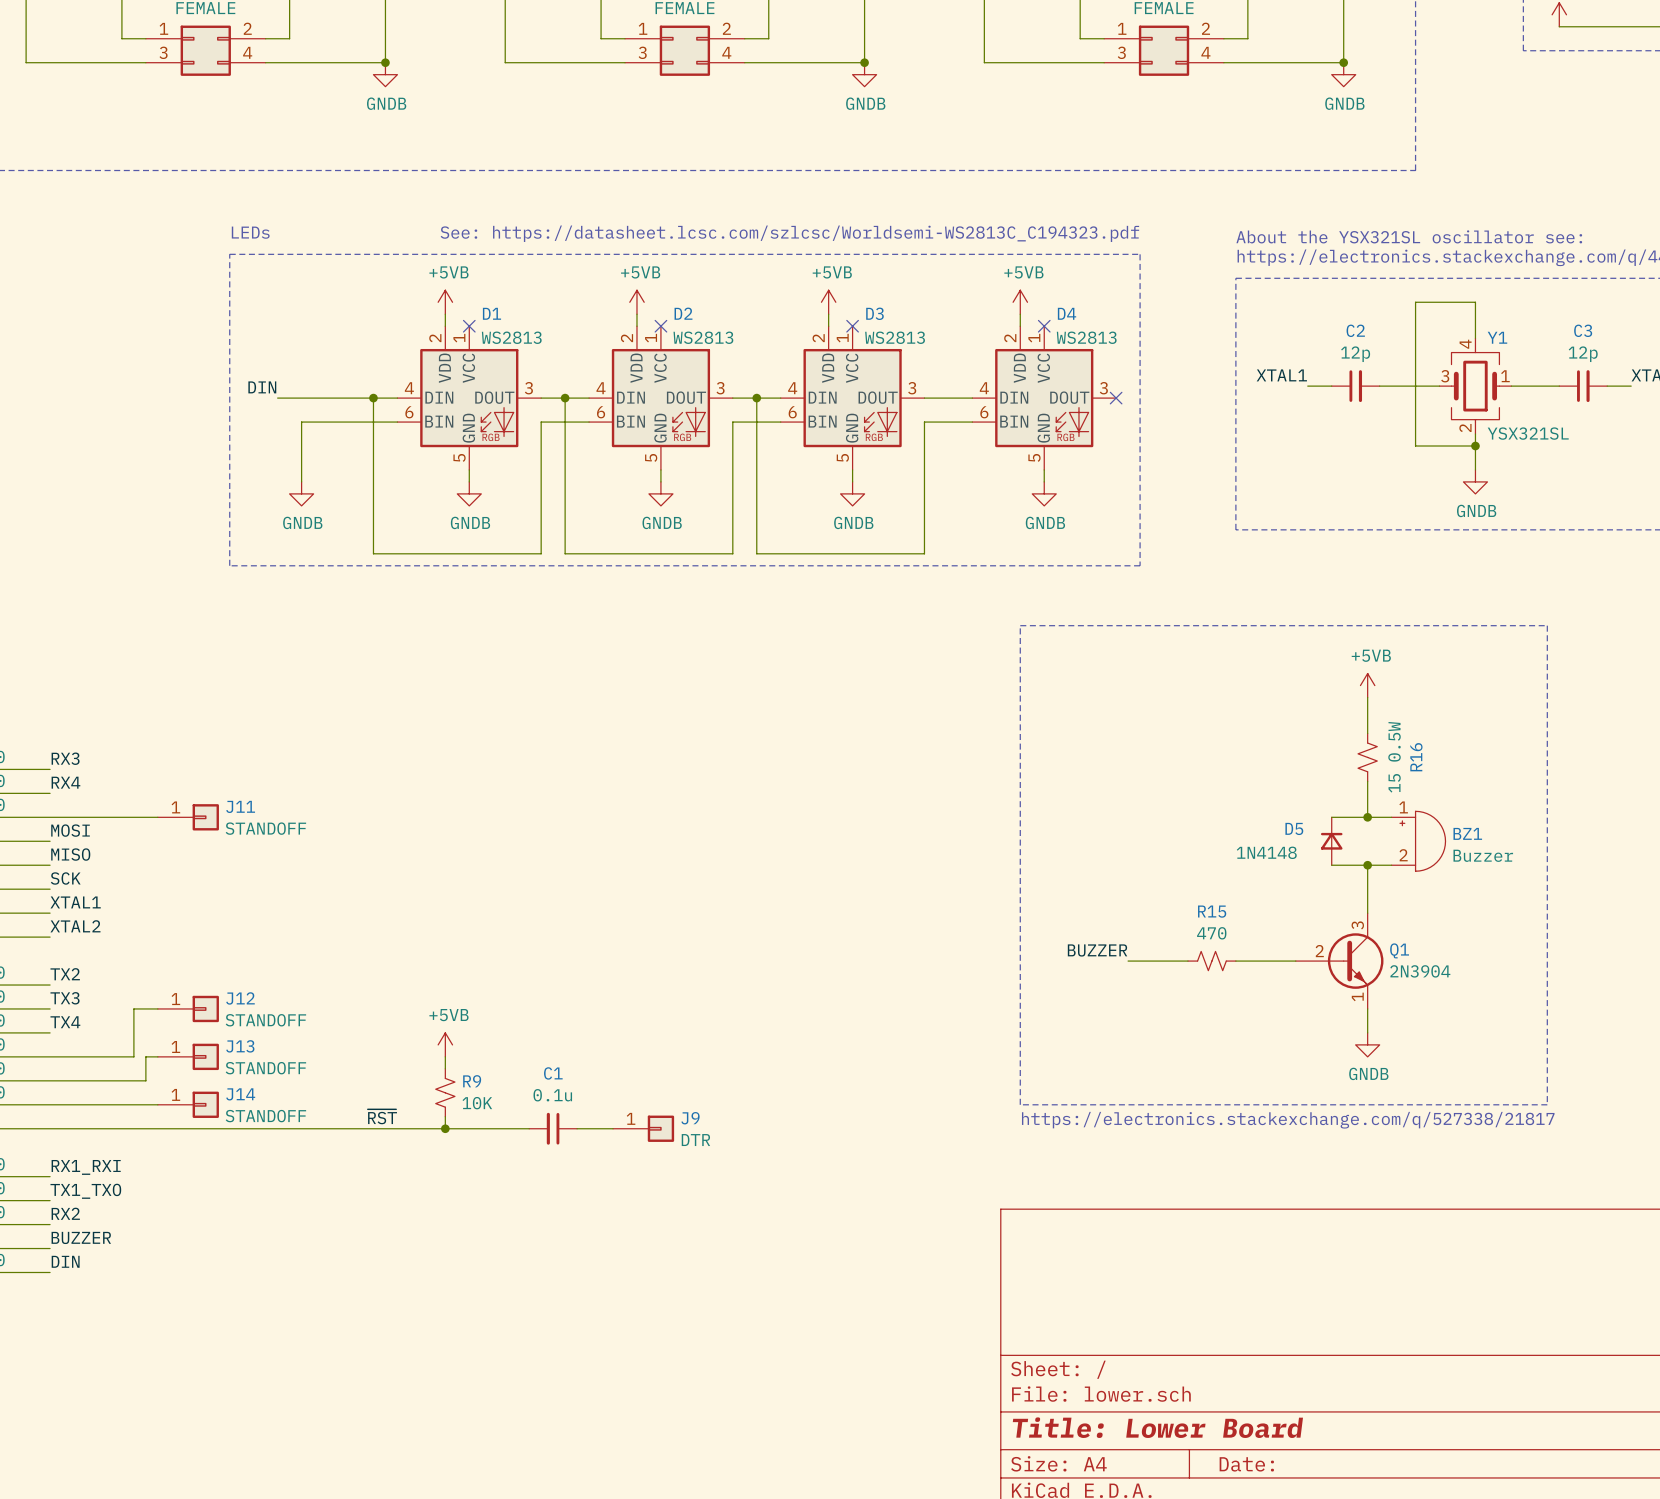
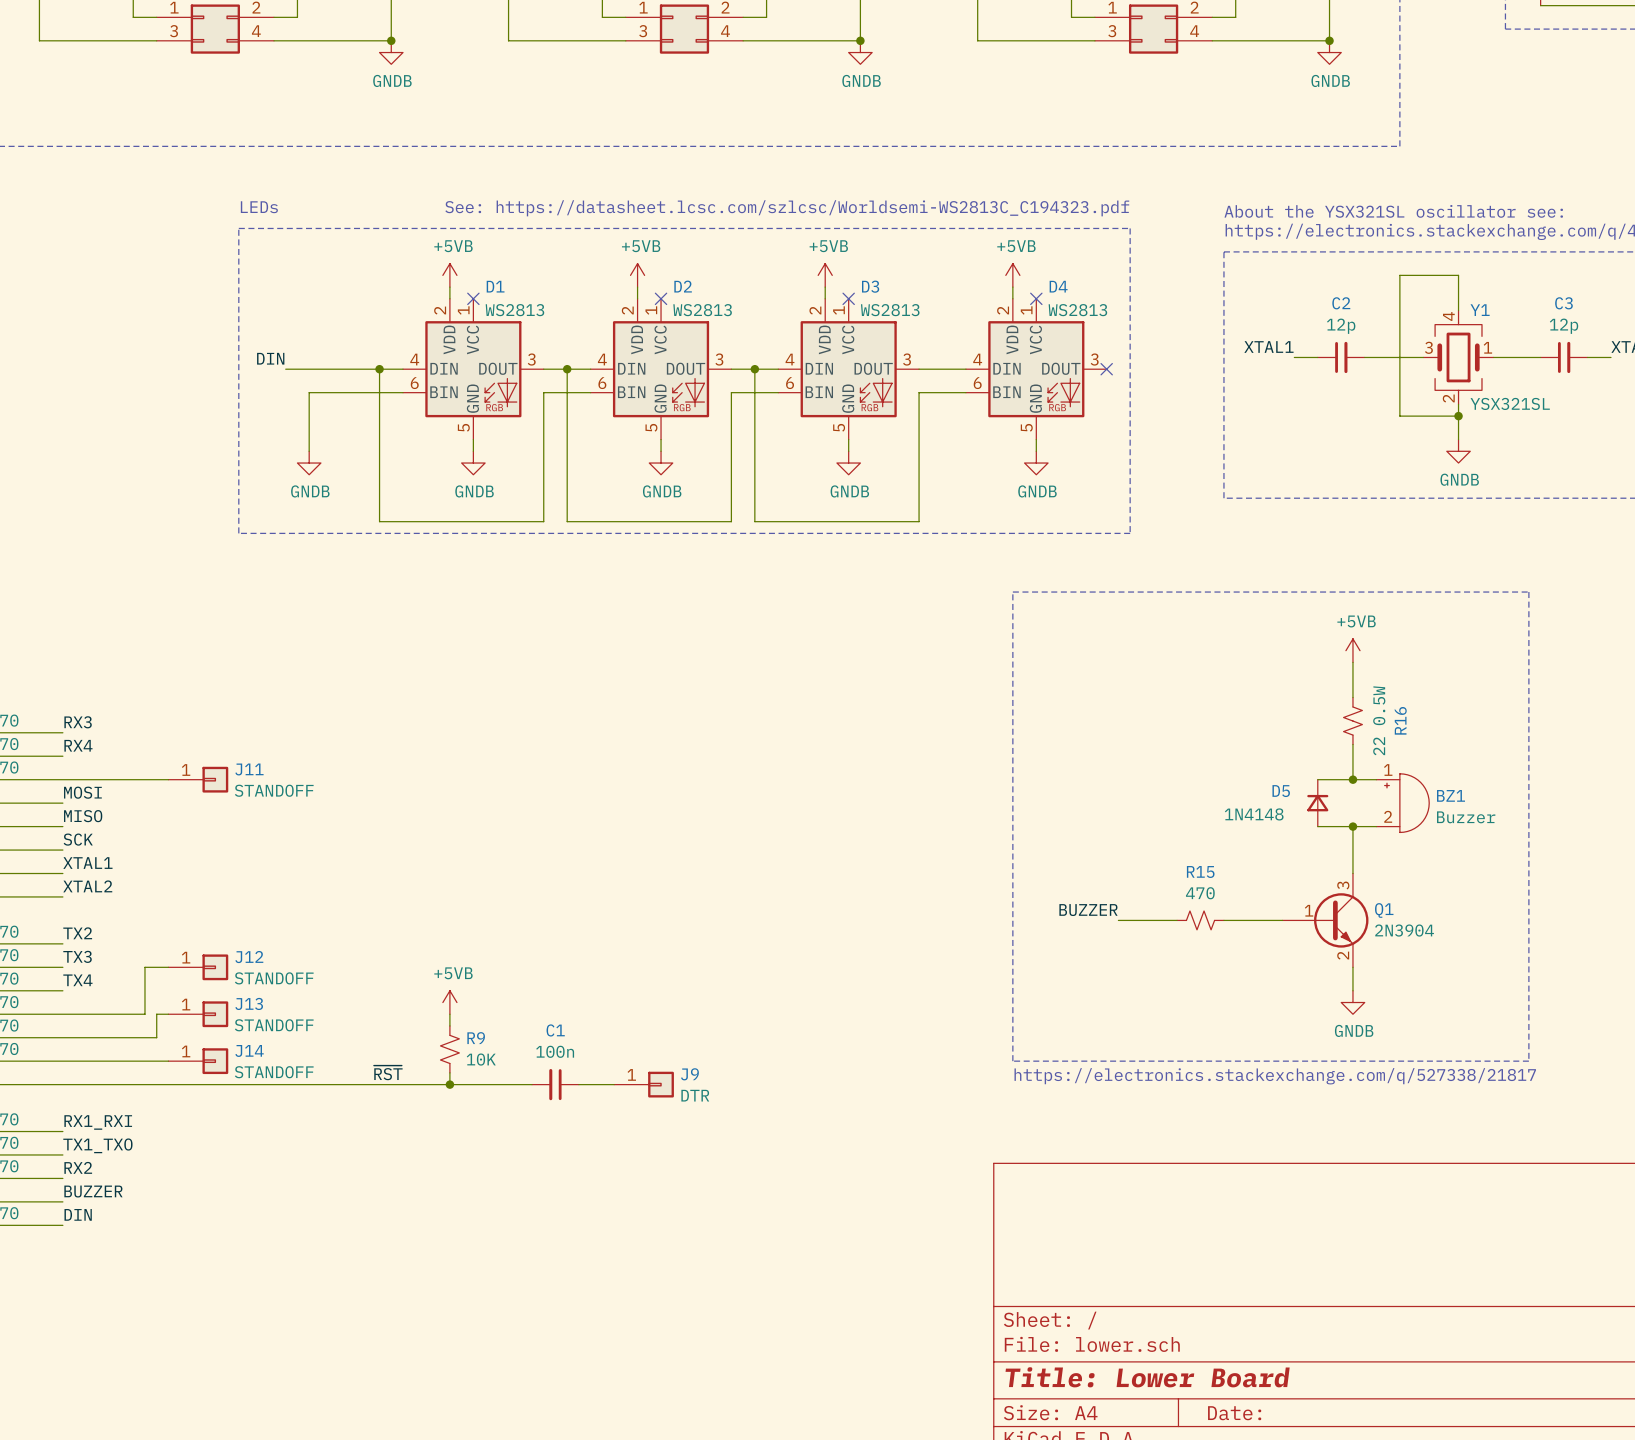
R16 value: 15 0.5W (1394, 757) -> 22 0.5W (1379, 720)
Q1 symbol: [1295, 913, 1384, 1009] -> [1282, 873, 1369, 968]
C1 value: 0.1u (552, 1095) -> 100n (555, 1051)

